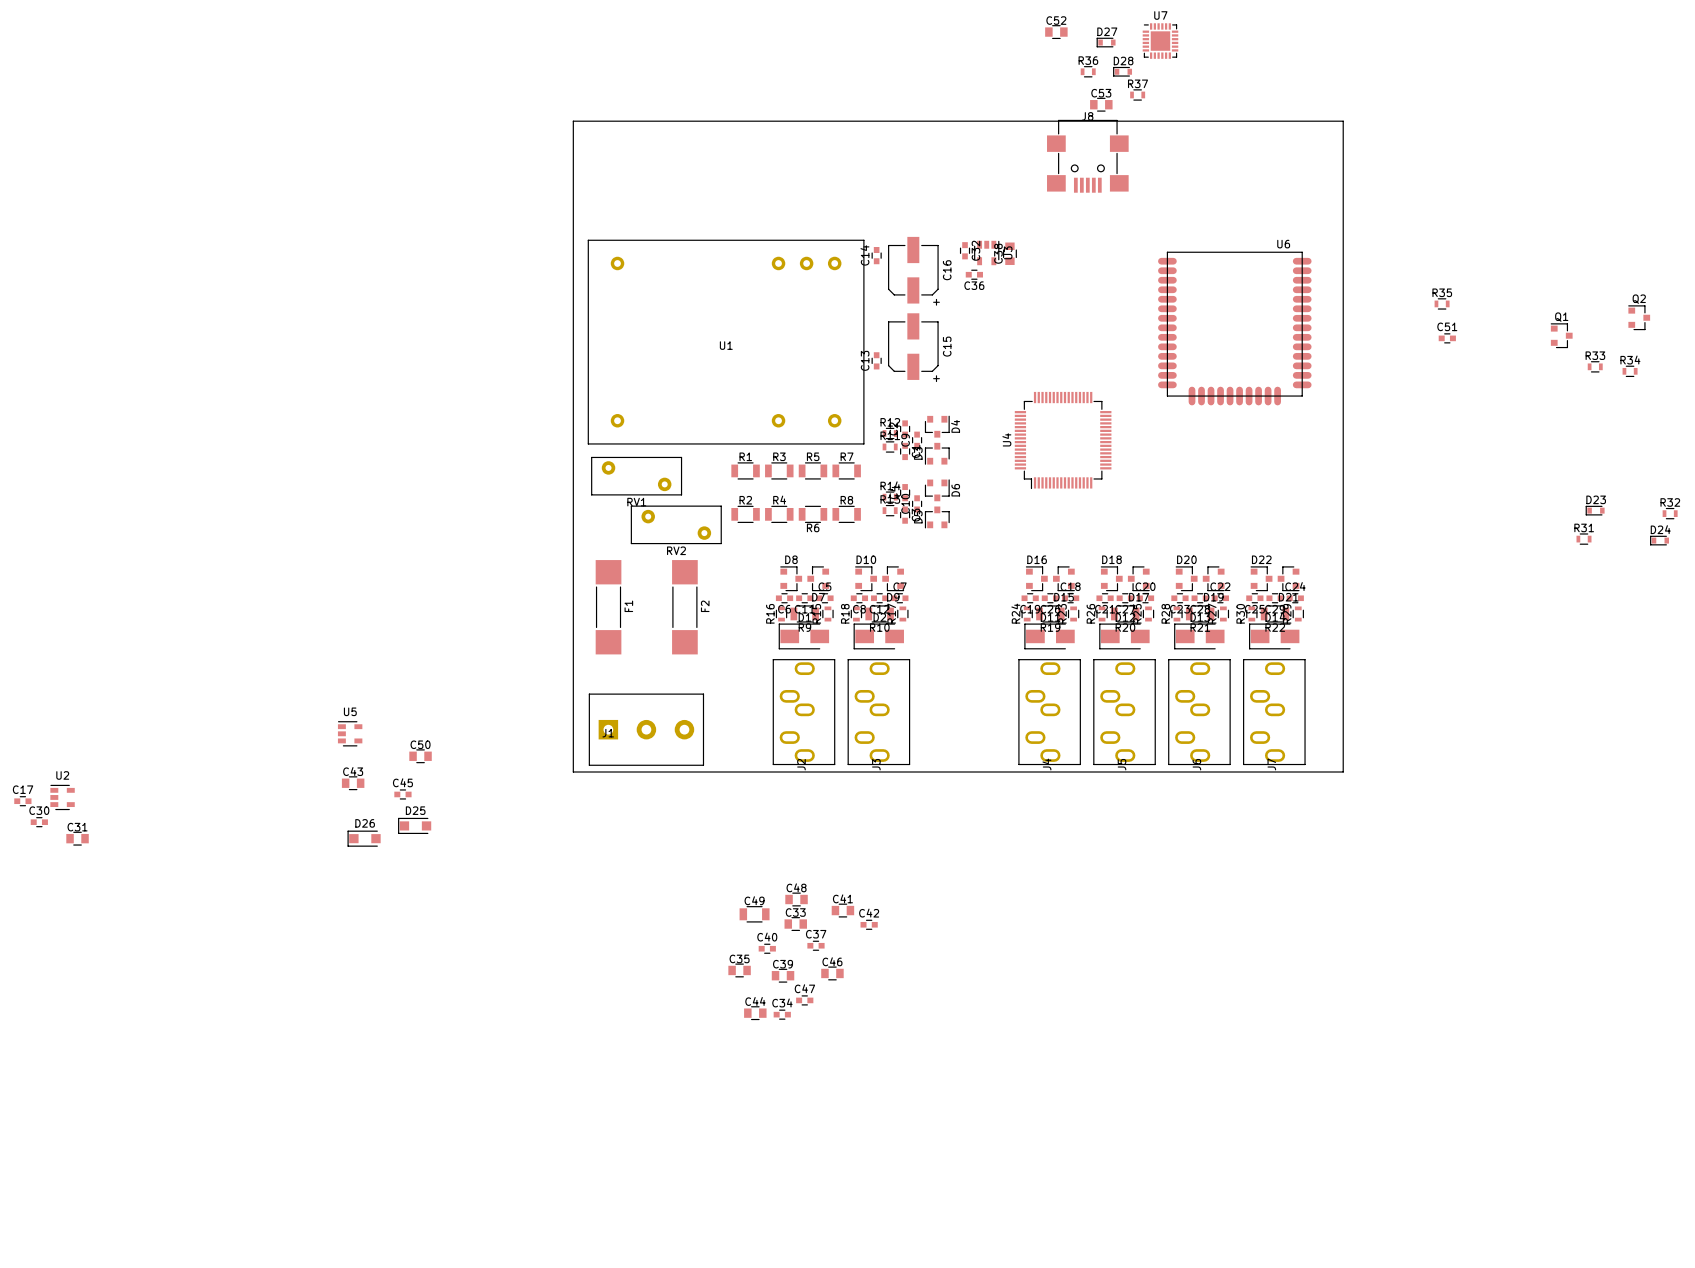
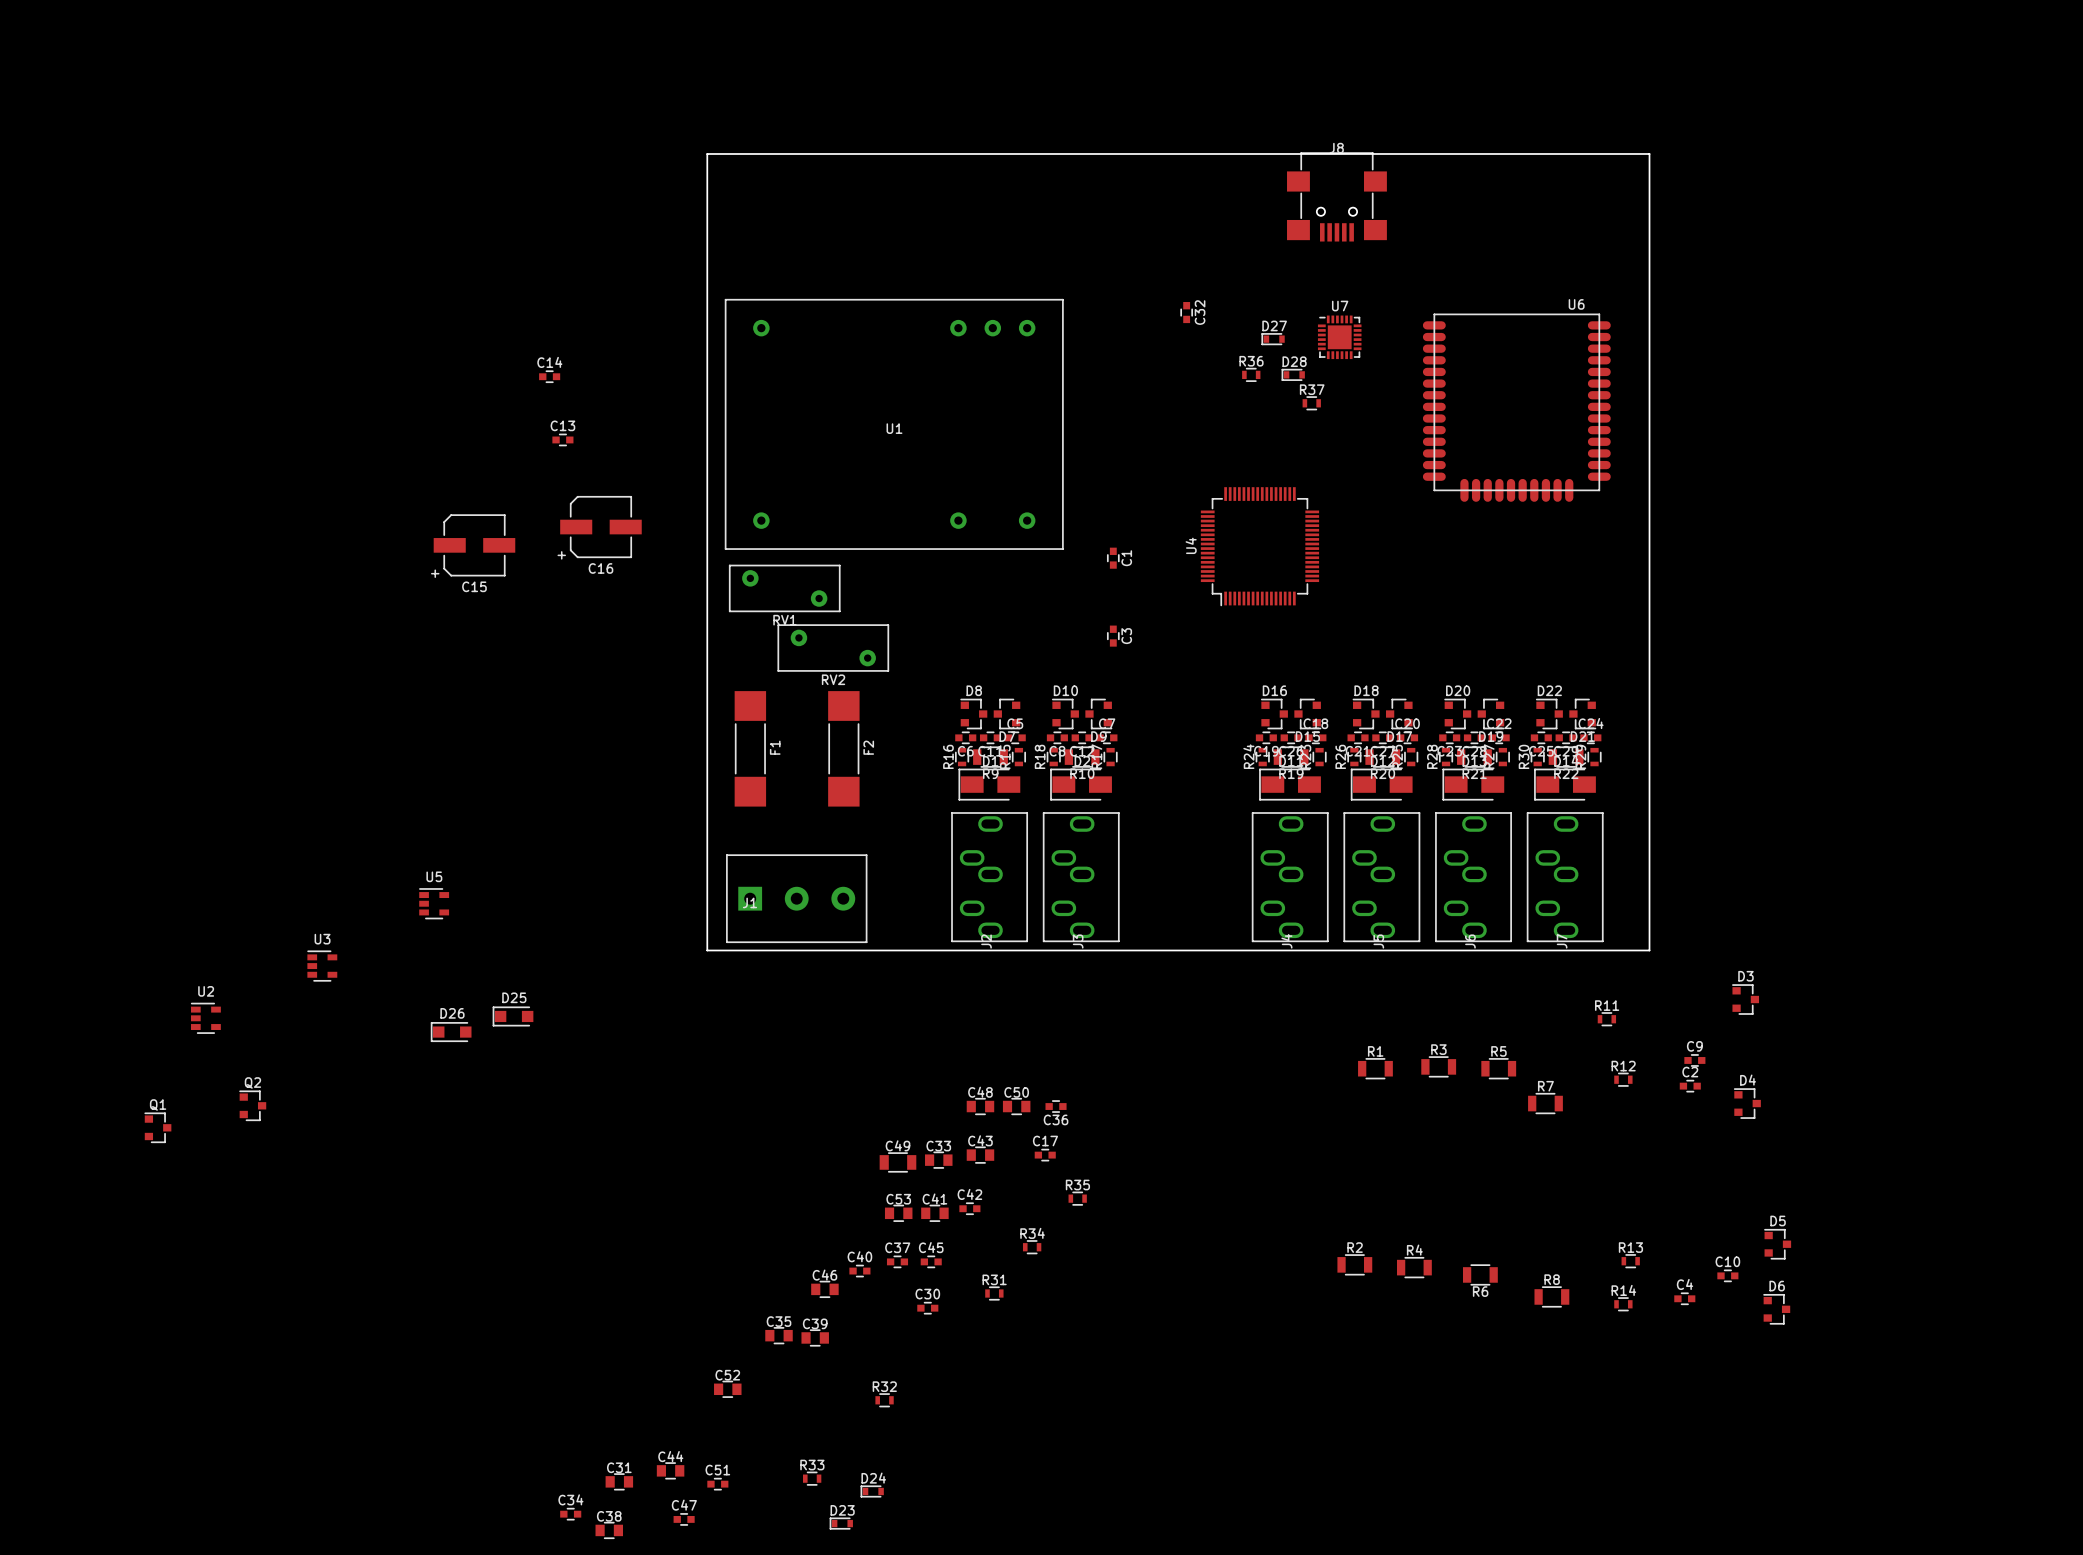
C52 position: (1056, 32) -> (727, 1389)
U7 position: (1160, 41) -> (1339, 337)
D27 position: (1106, 42) -> (1273, 339)
R36 position: (1088, 71) -> (1251, 374)
D28 position: (1122, 71) -> (1293, 374)
R37 position: (1137, 94) -> (1311, 403)
C53 position: (1101, 104) -> (898, 1213)
U3 rotation: 0° (986, 252) -> 90° counterclockwise (322, 966)
U3 position: (986, 252) -> (322, 966)
C38 rotation: 0° (1009, 253) -> 90° clockwise (609, 1530)
C38 position: (1009, 253) -> (609, 1530)
C14 rotation: 0° (876, 255) -> 90° clockwise (549, 376)
C14 position: (876, 255) -> (549, 376)
C16 rotation: 0° (913, 270) -> 90° clockwise (600, 527)
C16 position: (913, 270) -> (600, 527)
C36 position: (974, 274) -> (1056, 1106)
R35 position: (1442, 303) -> (1077, 1198)
Q2 position: (1639, 317) -> (252, 1105)
Q1 position: (1561, 335) -> (158, 1127)
C51 position: (1447, 338) -> (717, 1484)
C15 rotation: 0° (913, 346) -> 90° clockwise (474, 545)
C15 position: (913, 346) -> (474, 545)
C13 rotation: 0° (876, 360) -> 90° clockwise (562, 439)
C13 position: (876, 360) -> (562, 439)
R33 position: (1595, 366) -> (812, 1478)
R34 position: (1630, 371) -> (1032, 1247)
D4 rotation: 0° (937, 426) -> 90° counterclockwise (1747, 1103)
D4 position: (937, 426) -> (1747, 1103)
C2 rotation: 0° (905, 428) -> 90° clockwise (1690, 1086)
C2 position: (905, 428) -> (1690, 1086)
R12 position: (890, 433) -> (1623, 1079)
C9 rotation: 0° (917, 440) -> 90° clockwise (1694, 1060)
C9 position: (917, 440) -> (1694, 1060)
U4 position: (1063, 440) -> (1259, 546)
R11 position: (890, 446) -> (1606, 1019)
D3 rotation: 0° (937, 453) -> 90° clockwise (1745, 999)
D3 position: (937, 453) -> (1745, 999)
R1 position: (745, 470) -> (1375, 1068)
R3 position: (779, 470) -> (1438, 1066)
R5 position: (812, 470) -> (1498, 1068)
R7 position: (846, 470) -> (1545, 1103)
D6 rotation: 0° (937, 490) -> 90° counterclockwise (1776, 1309)
D6 position: (937, 490) -> (1776, 1309)
C4 rotation: 0° (905, 492) -> 90° clockwise (1684, 1298)
C4 position: (905, 492) -> (1684, 1298)
R14 position: (890, 497) -> (1623, 1304)
C10 rotation: 0° (917, 503) -> 90° clockwise (1727, 1275)
C10 position: (917, 503) -> (1727, 1275)
R13 position: (890, 510) -> (1630, 1261)
D23 position: (1595, 510) -> (841, 1523)
R32 position: (1670, 513) -> (884, 1400)
R2 position: (745, 514) -> (1354, 1264)
R4 position: (779, 514) -> (1414, 1267)
R6 position: (812, 514) -> (1480, 1274)
R8 position: (846, 514) -> (1551, 1296)
D5 rotation: 0° (937, 517) -> 90° clockwise (1777, 1244)
D5 position: (937, 517) -> (1777, 1244)
R31 position: (1583, 539) -> (994, 1293)
D24 position: (1659, 540) -> (872, 1491)
C50 position: (420, 756) -> (1016, 1106)
C43 position: (353, 783) -> (980, 1155)
C45 position: (402, 794) -> (931, 1261)
U2 position: (62, 797) -> (205, 1018)
C17 position: (22, 801) -> (1045, 1155)
C30 position: (39, 822) -> (927, 1308)
C31 position: (77, 838) -> (619, 1481)
C41 position: (842, 910) -> (934, 1213)
C49 position: (754, 914) -> (897, 1162)
C33 position: (795, 924) -> (938, 1160)
C42 position: (869, 924) -> (969, 1208)
C37 position: (815, 945) -> (897, 1261)
C40 position: (767, 948) -> (859, 1271)
C35 position: (739, 970) -> (779, 1335)
C46 position: (832, 973) -> (824, 1289)
C39 position: (783, 975) -> (815, 1337)
C47 position: (804, 1000) -> (684, 1519)
C44 position: (755, 1013) -> (670, 1470)
C34 position: (782, 1014) -> (570, 1514)

